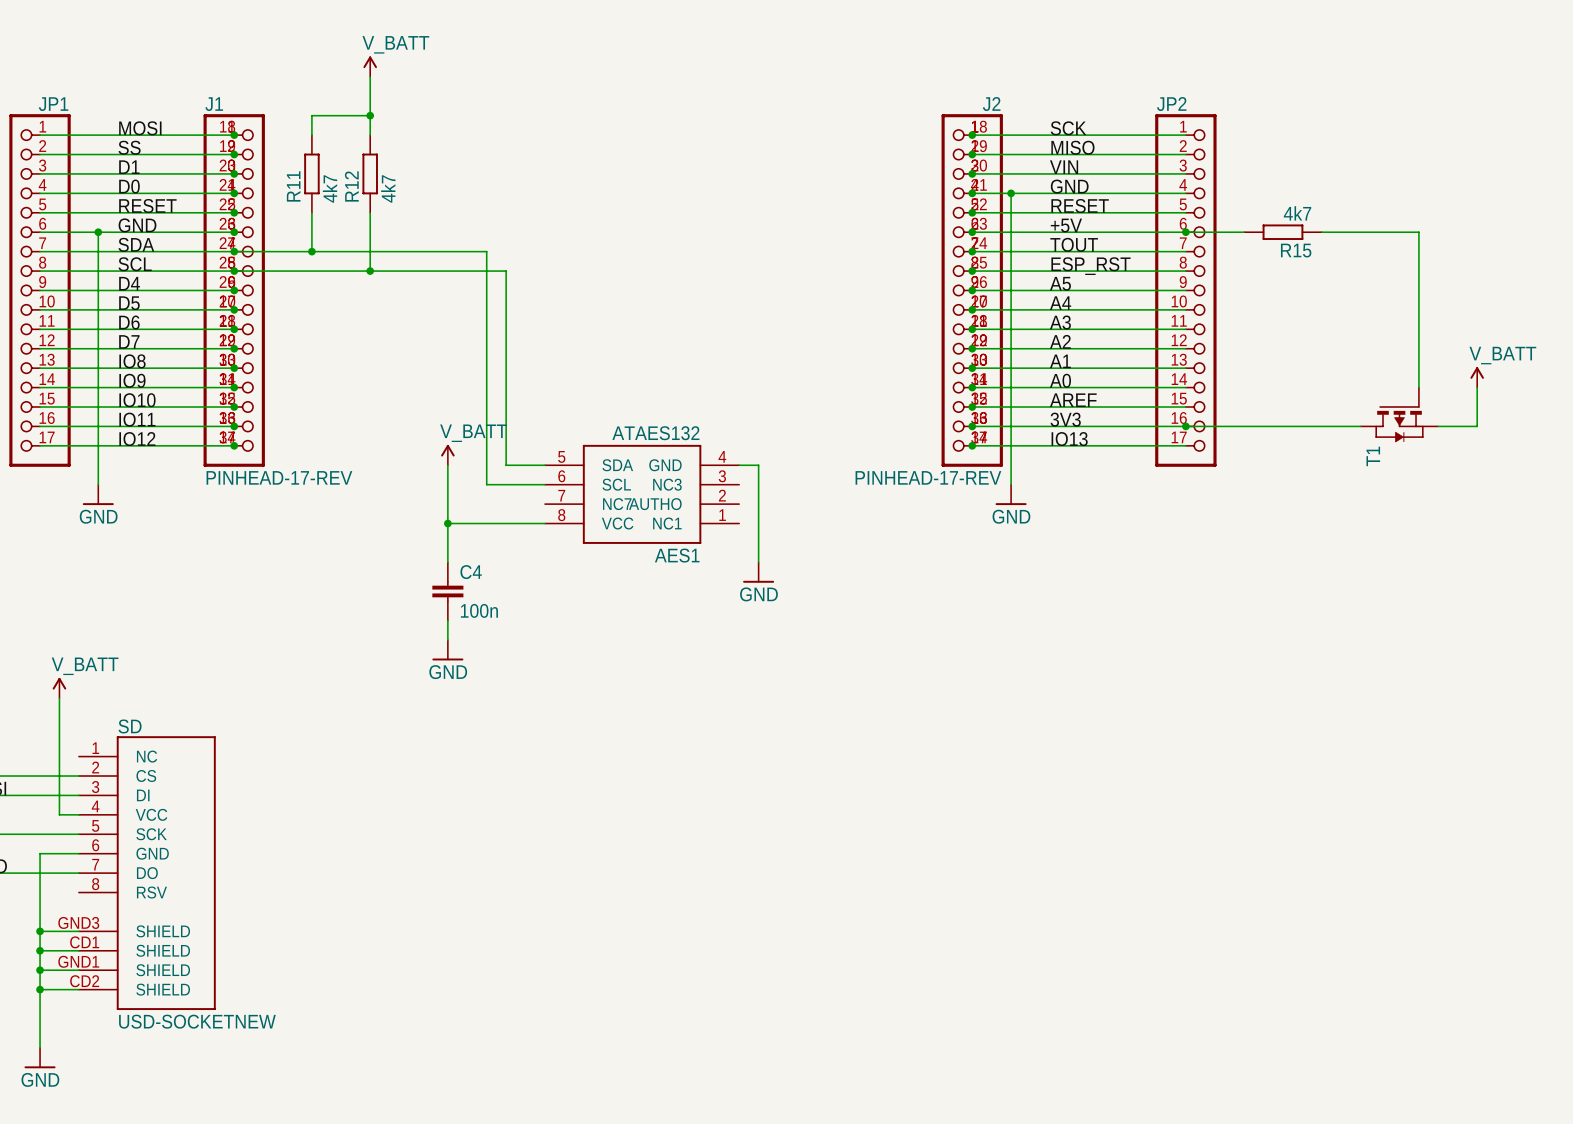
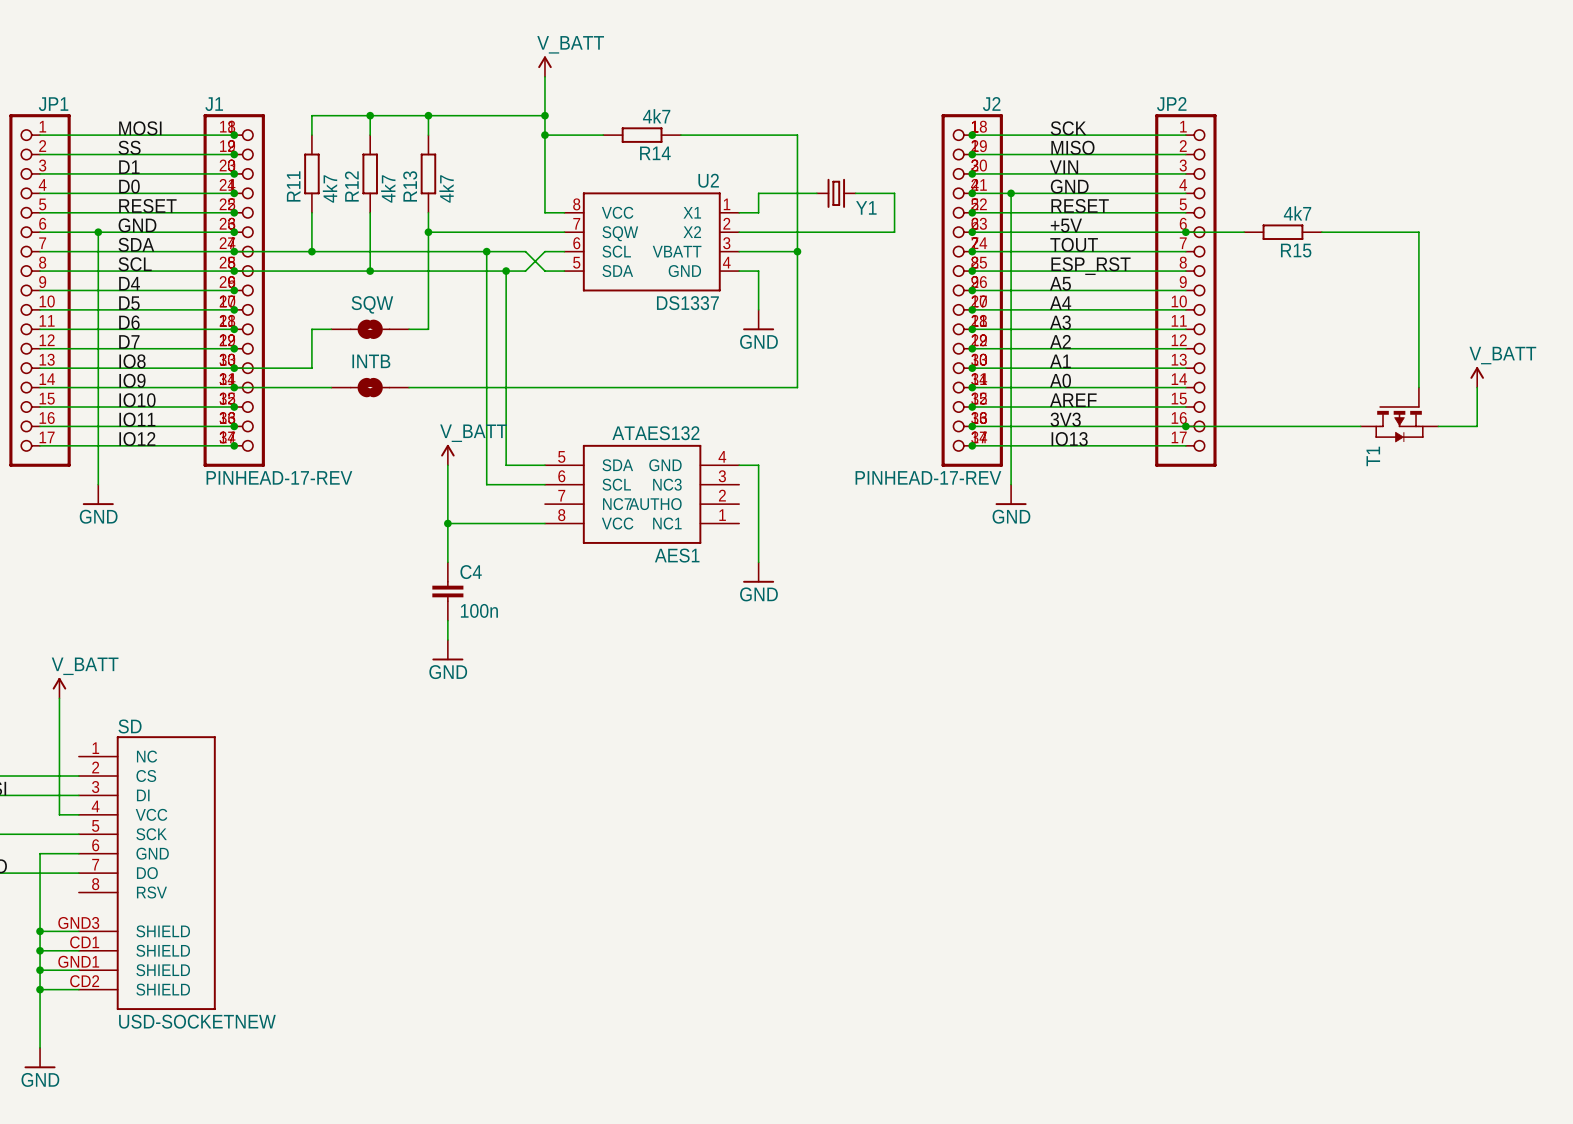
power symbol position: V_BATT (370, 66) -> V_BATT (544, 66)
wire: (370, 76) (370, 115) -> (544, 115) (370, 115)
wire: none -> (544, 76) (544, 212) (564, 212)
wire: none -> (428, 115) (428, 135)
junction: none -> (428, 115)
junction: none -> (544, 115)
wire: none -> (544, 135) (603, 135)
junction: none -> (544, 135)
R14: none -> 4k7 (642, 135)
wire: none -> (680, 135) (797, 135) (797, 387) (409, 387)
R13: none -> 4k7 (428, 173)
wire: none -> (816, 193) (758, 193) (758, 212) (739, 212)
Y1: none -> (836, 193)
wire: none -> (855, 193) (894, 193) (894, 232) (739, 232)
wire: none -> (428, 212) (428, 329) (409, 329)
wire: none -> (428, 232) (564, 232)
junction: none -> (428, 232)
U2: none -> DS1337 (651, 241)
wire: none -> (486, 251) (525, 251) (544, 271) (564, 271)
junction: none -> (486, 251)
wire: none -> (564, 251) (544, 251) (525, 271) (506, 271)
wire: none -> (739, 251) (797, 251)
junction: none -> (797, 251)
junction: none -> (506, 271)
wire: none -> (739, 271) (758, 271) (758, 309)
power symbol: none -> GND (758, 320)
wire: none -> (331, 329) (311, 329) (311, 368) (234, 368)
SQW: none -> (370, 329)
wire: none -> (234, 387) (331, 387)
INTB: none -> (370, 387)

